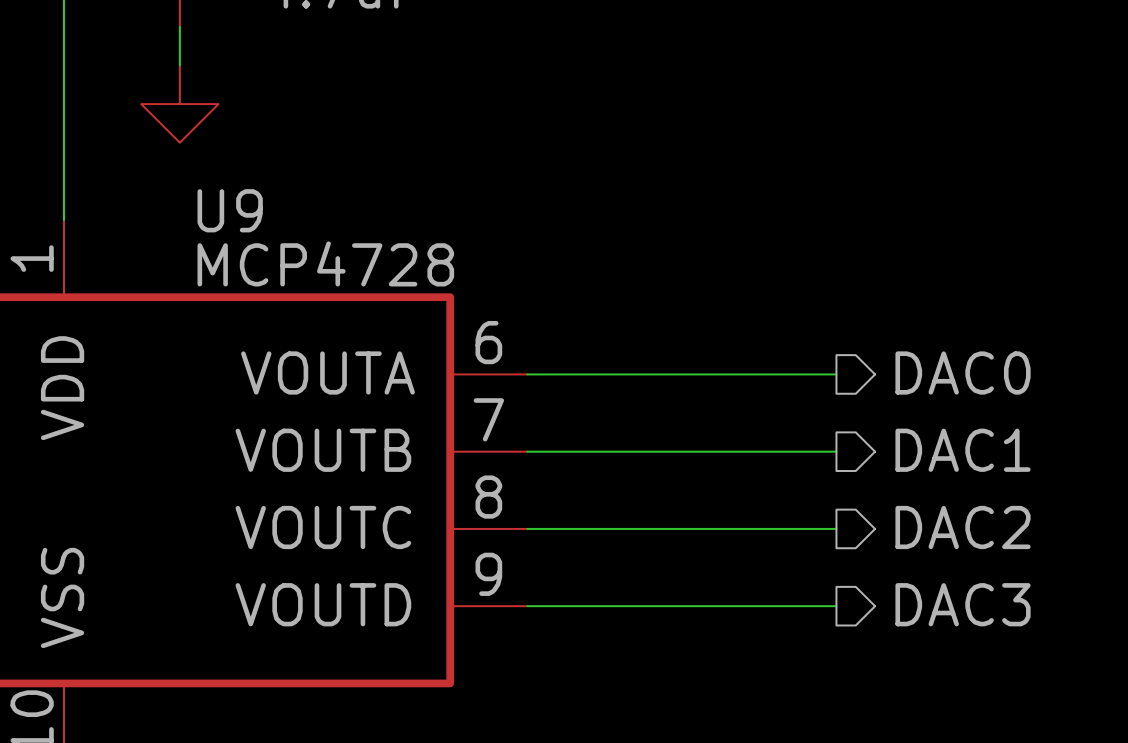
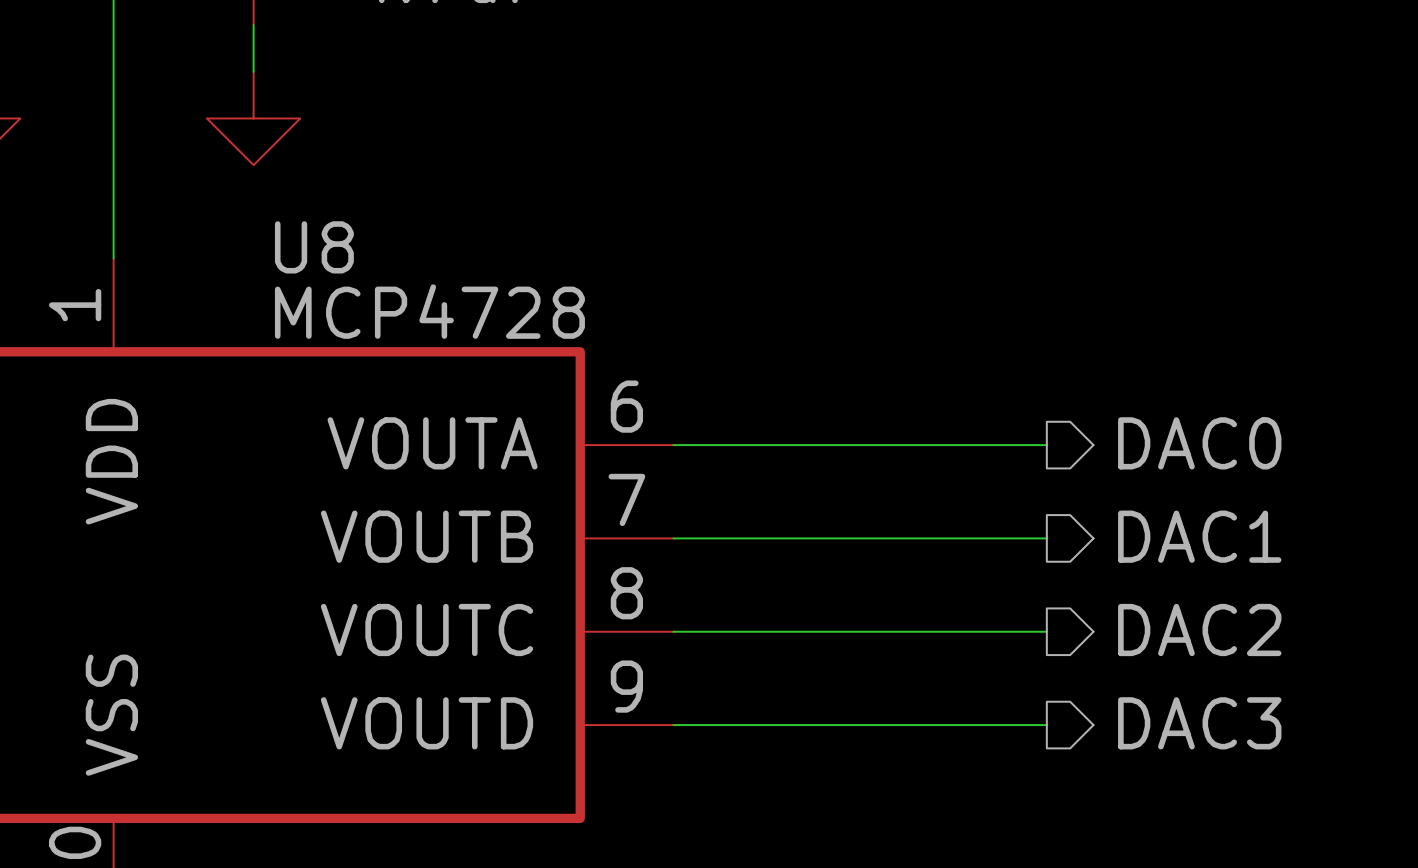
U9 name: U9 (230, 210) -> U8 (314, 247)

